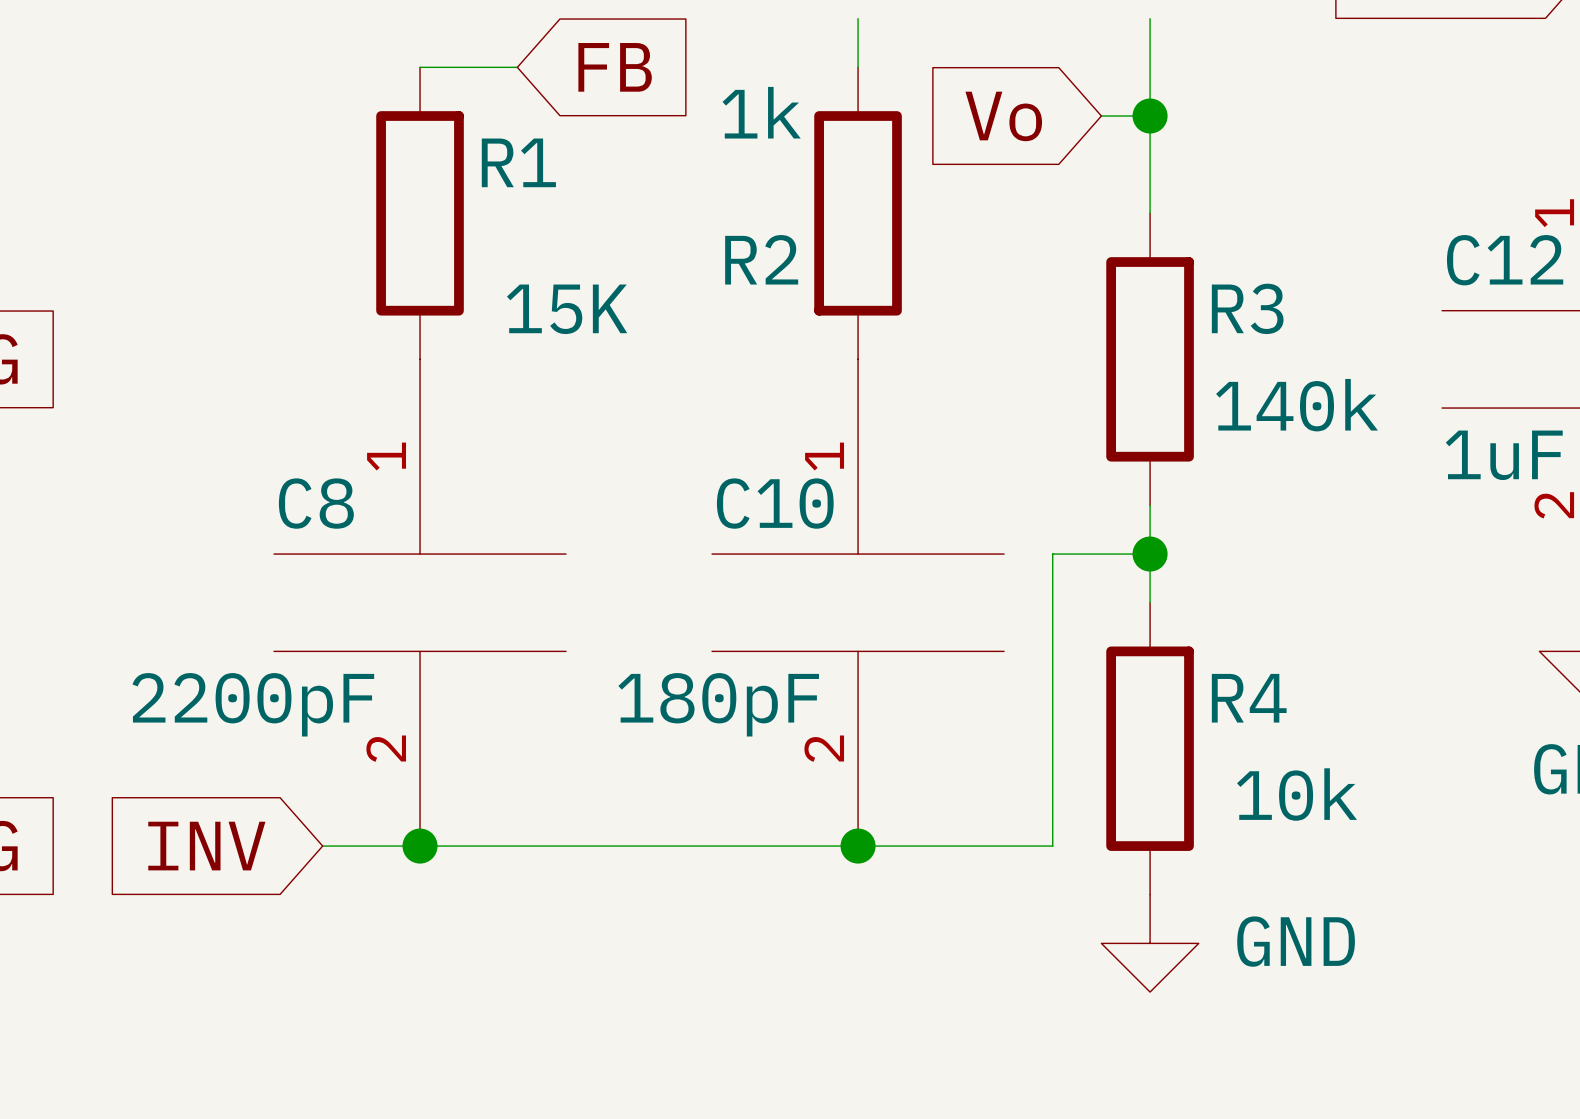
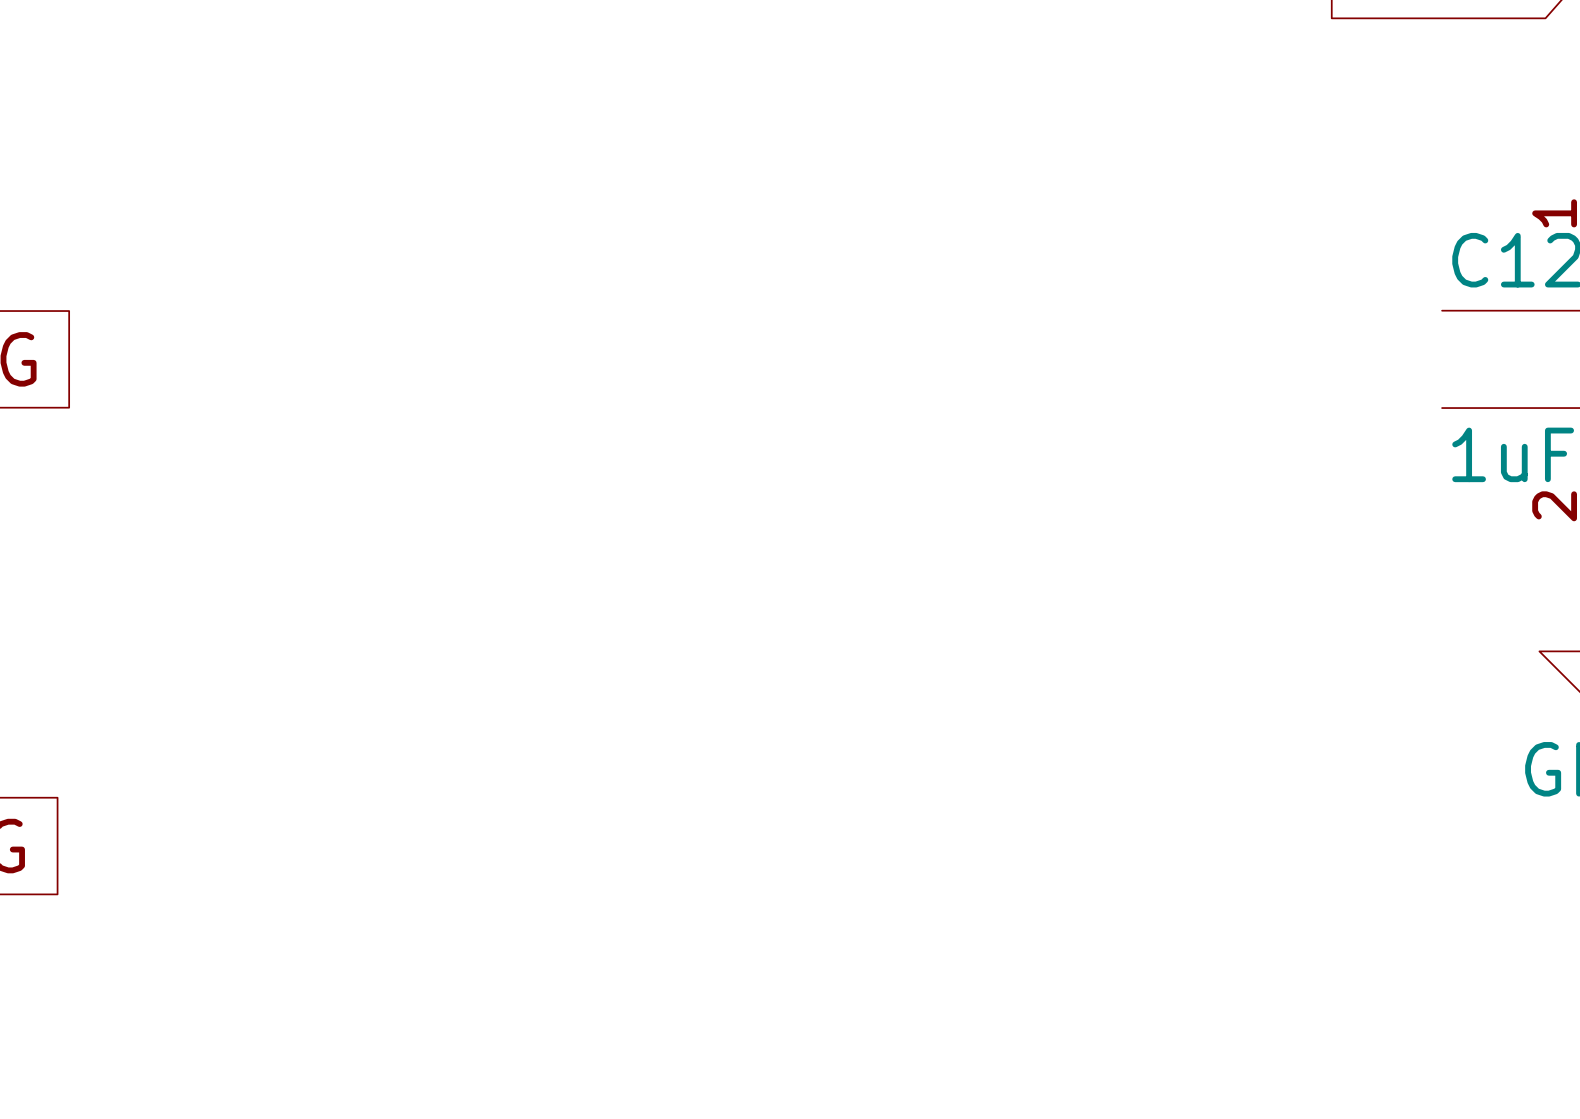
wire: (858, 18) (858, 67) -> none
wire: (1150, 18) (1150, 213) -> none
wire: (420, 67) (517, 67) -> none
global label: FB (615, 67) -> none
global label: Vo (1003, 116) -> none
wire: (1101, 116) (1150, 116) -> none
junction: (1150, 116) -> none
R1: 15K (420, 213) -> none
R2: 1k (858, 213) -> none
R3: 140k (1150, 359) -> none
wire: (1150, 505) (1150, 602) -> none
wire: (1150, 554) (1052, 554) (1052, 846) (322, 846) -> none
junction: (1150, 554) -> none
C8: 2200pF (420, 602) -> none
C10: 180pF (858, 602) -> none
R4: 10k (1150, 748) -> none
global label: INV (206, 846) -> none
junction: (420, 846) -> none
junction: (858, 846) -> none
power symbol: GND (1150, 943) -> none

